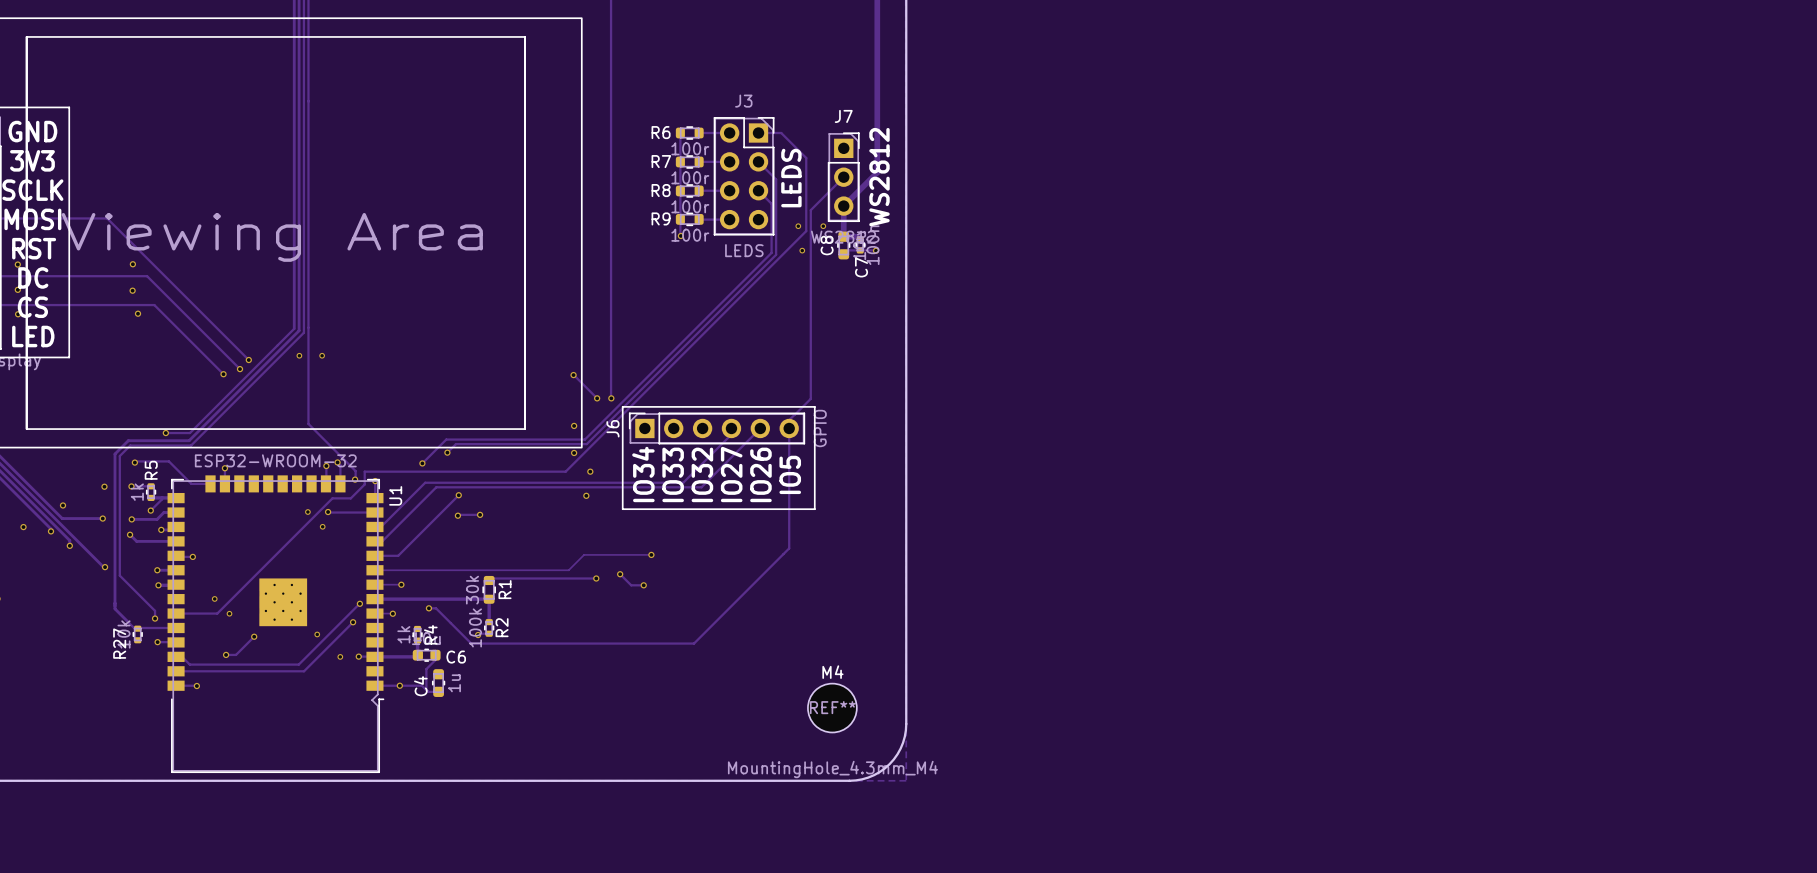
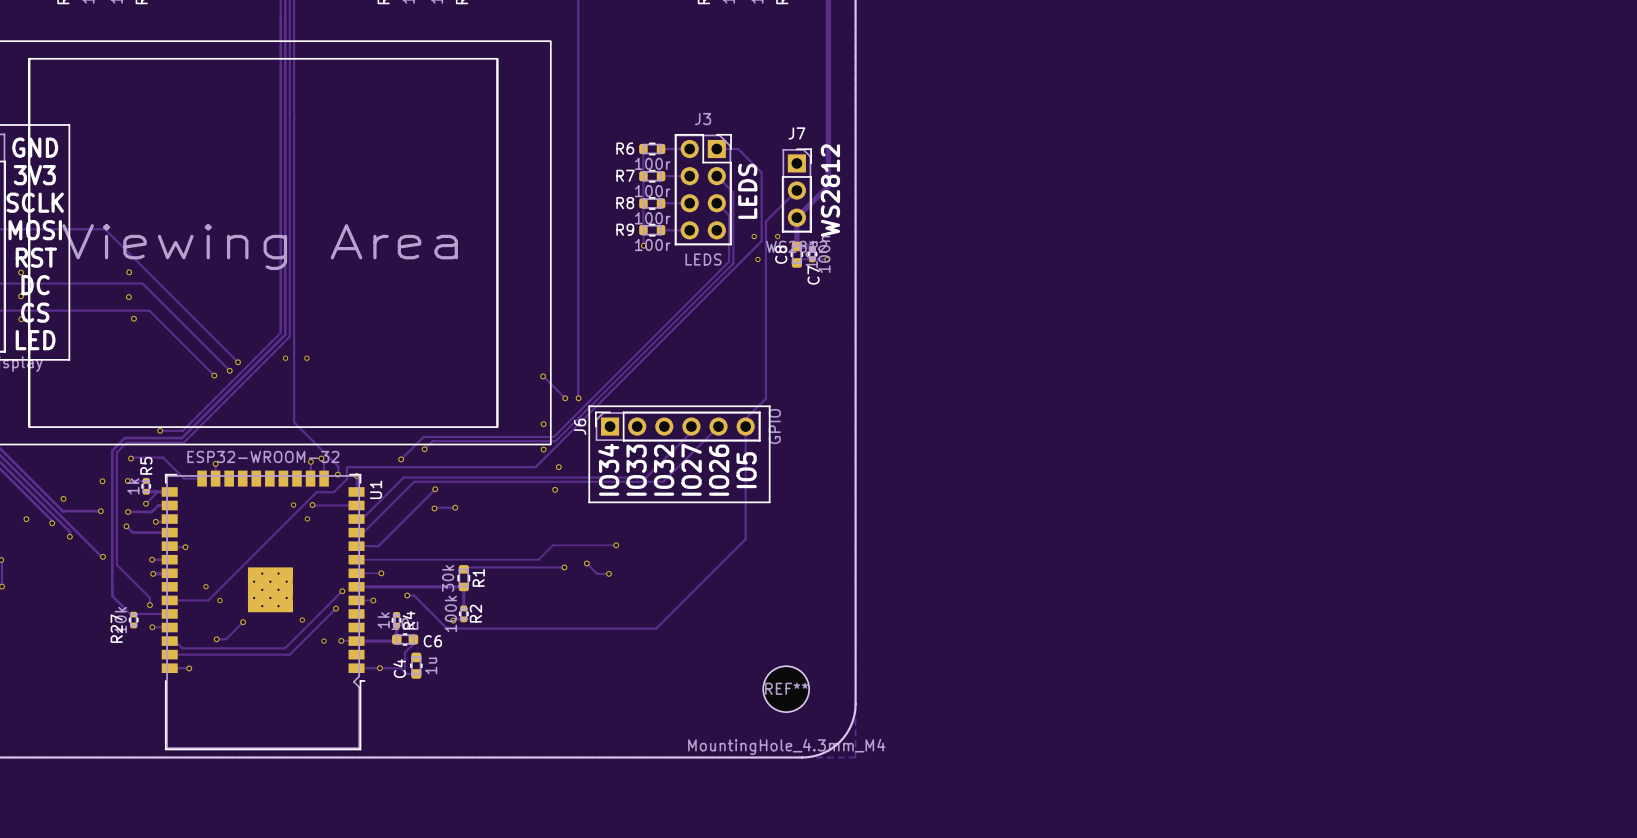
text: M4 (832, 672) -> none

